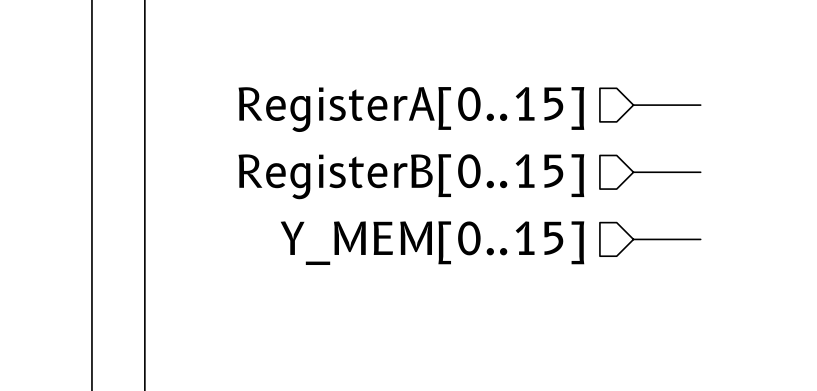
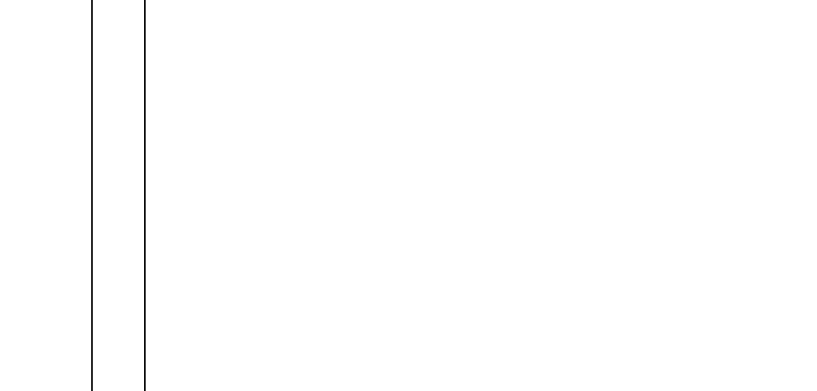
bus: (633, 105) (700, 105) -> none
hierarchical label: RegisterA[0..15] (411, 109) -> none
bus: (633, 172) (700, 172) -> none
hierarchical label: RegisterB[0..15] (411, 176) -> none
bus: (633, 239) (700, 239) -> none
hierarchical label: Y_MEM[0..15] (432, 243) -> none

